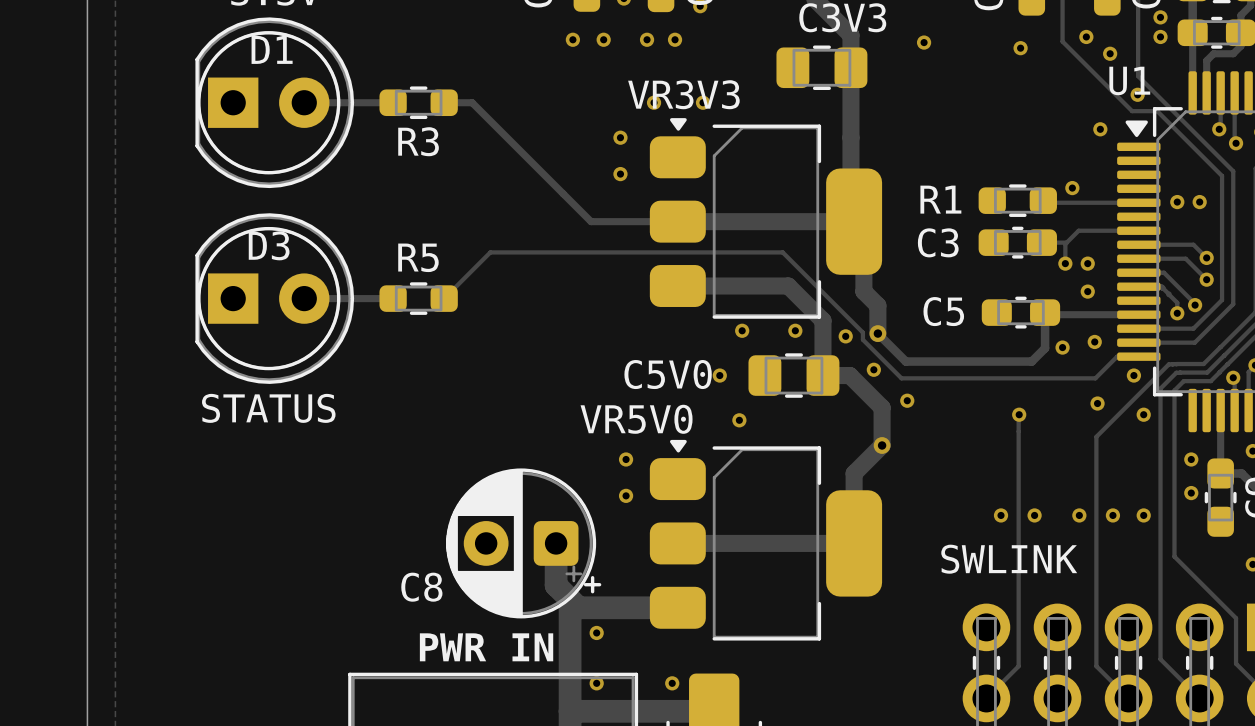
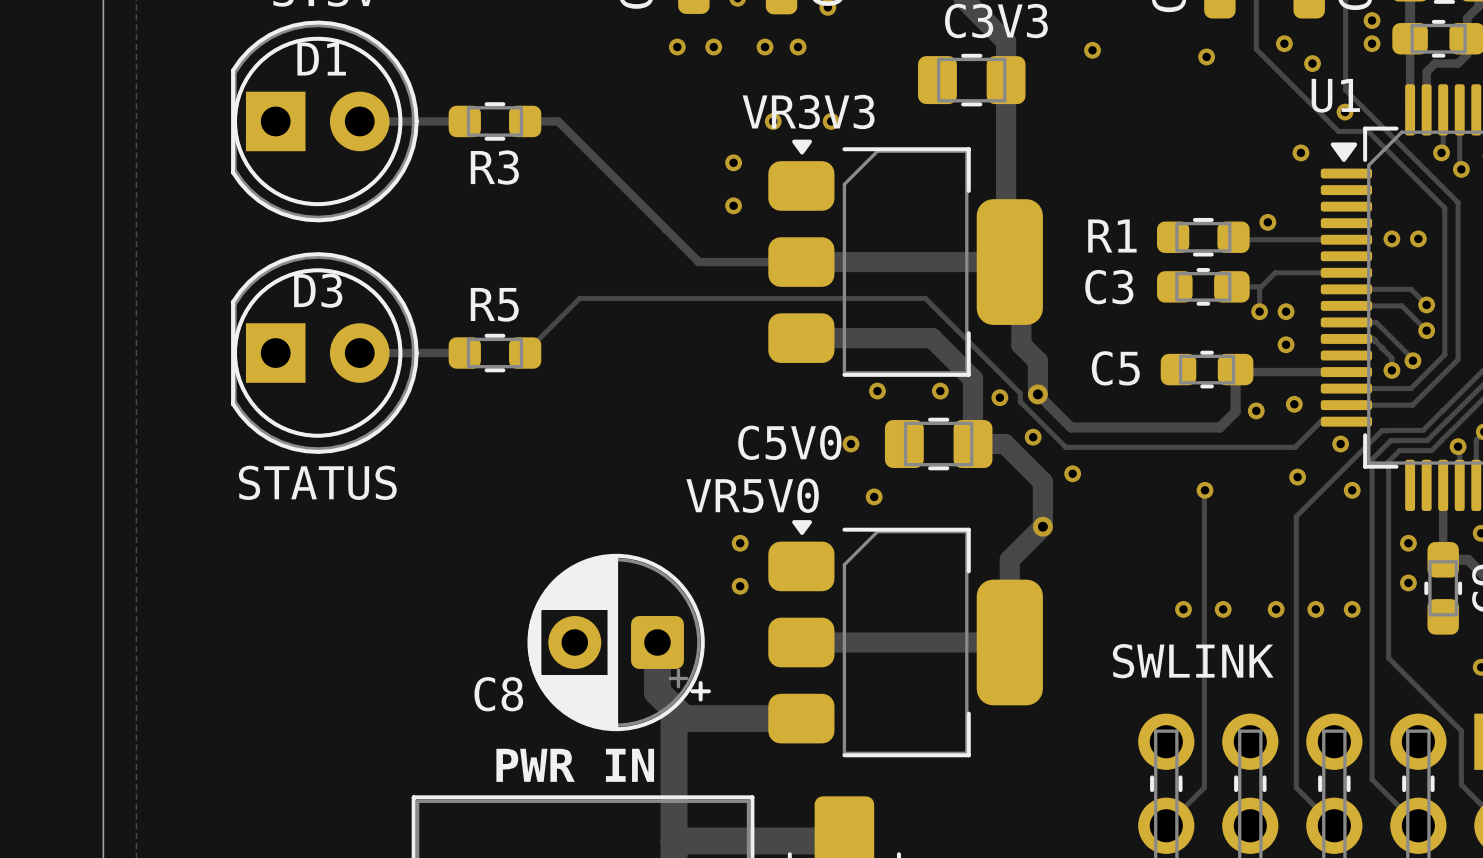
via: (596, 632) -> none
via: (596, 683) -> none
via: (672, 683) -> none

